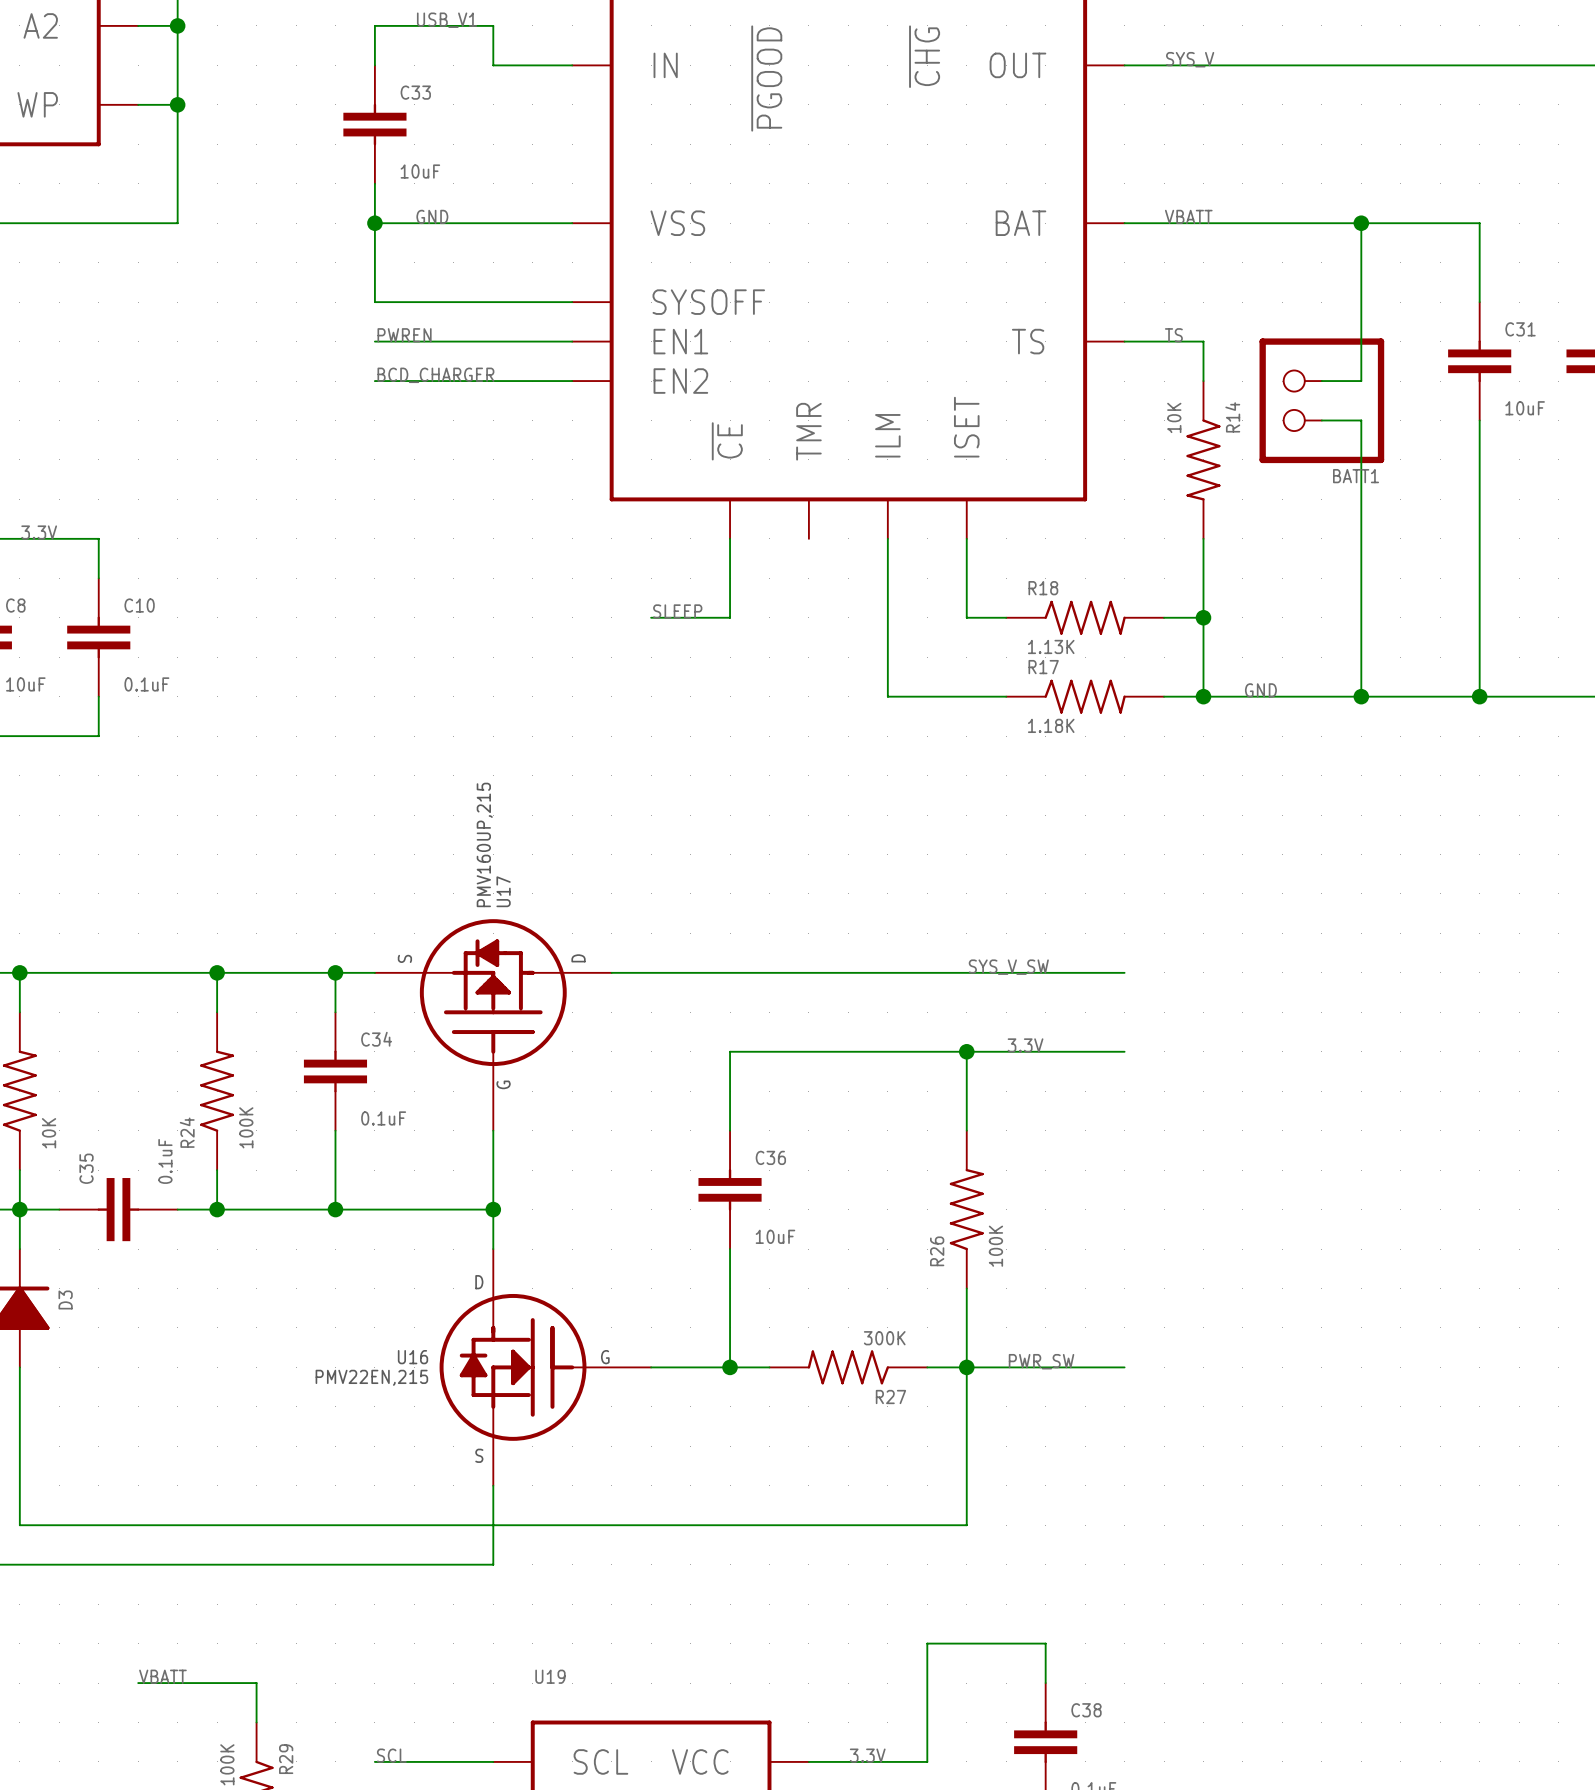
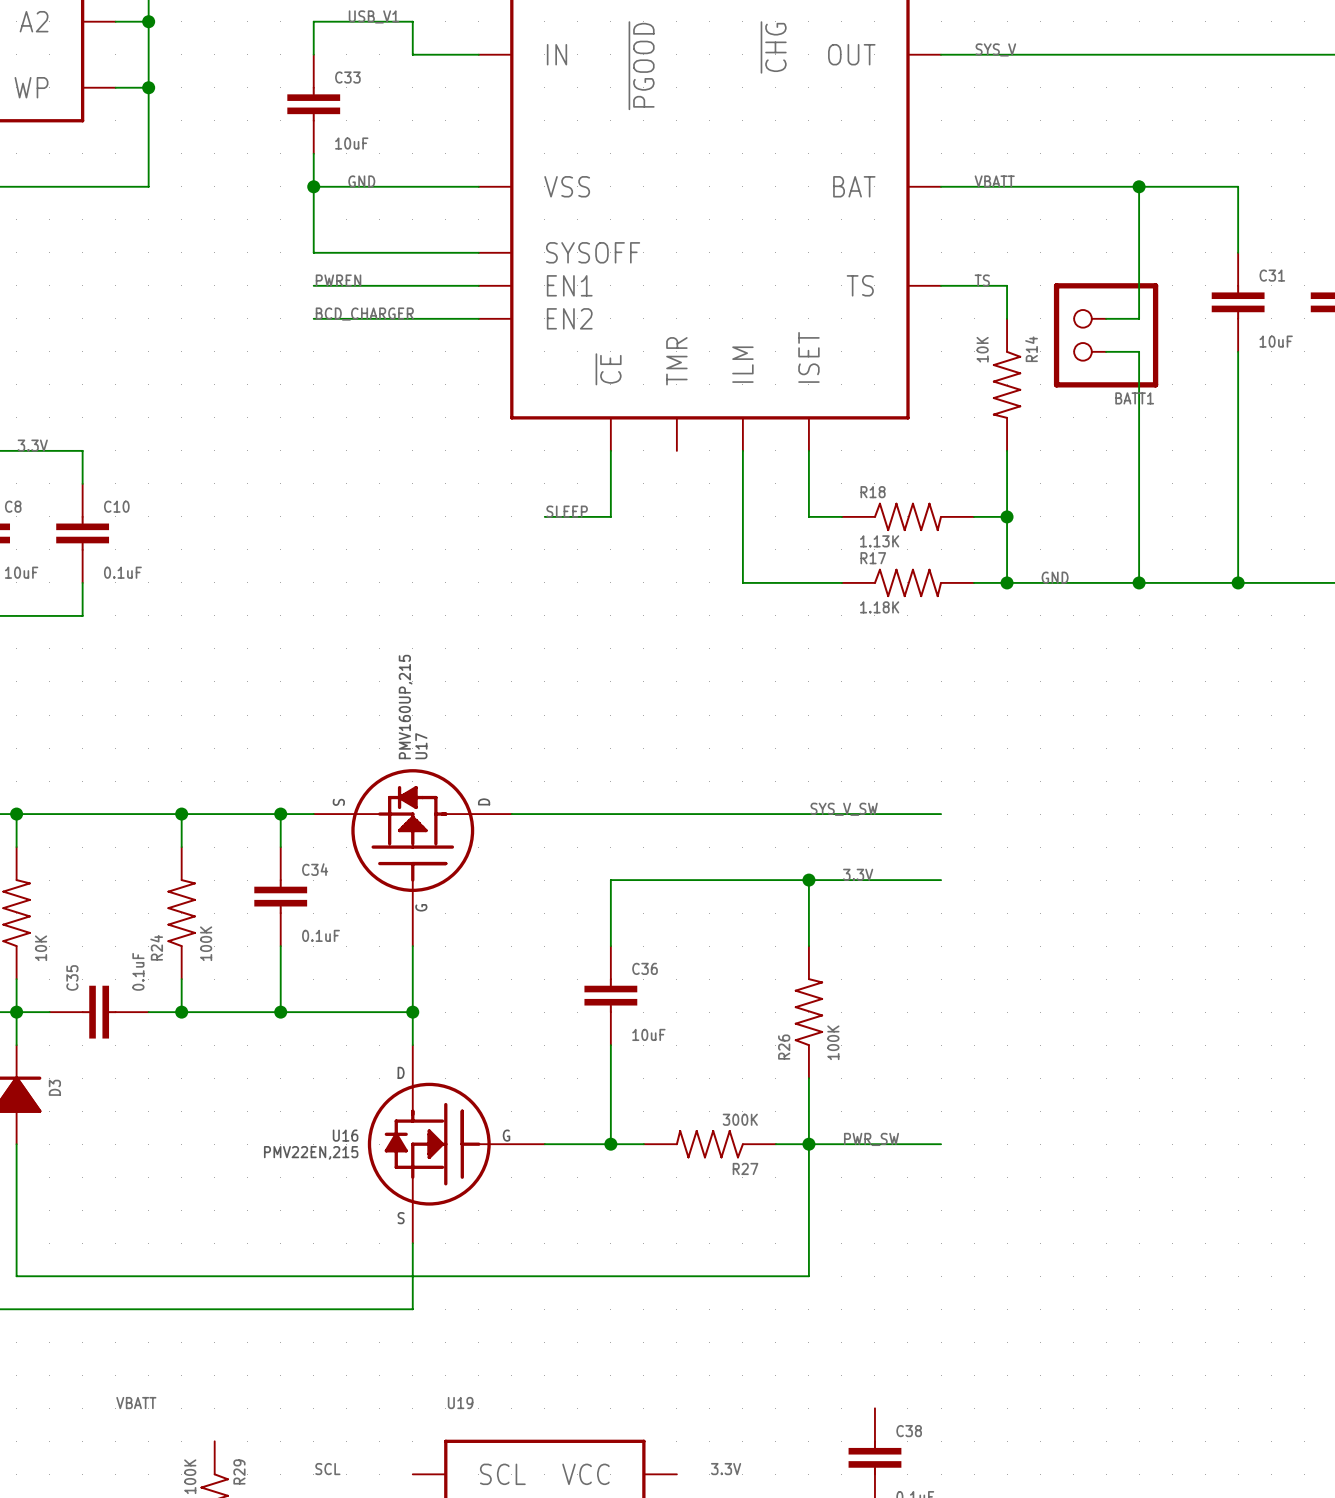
wire: (138, 1683) (256, 1683) (256, 1722) -> none
wire: (1045, 1683) (1045, 1643) (927, 1643) (927, 1761) (808, 1761) -> none
wire: (374, 1761) (493, 1761) -> none

